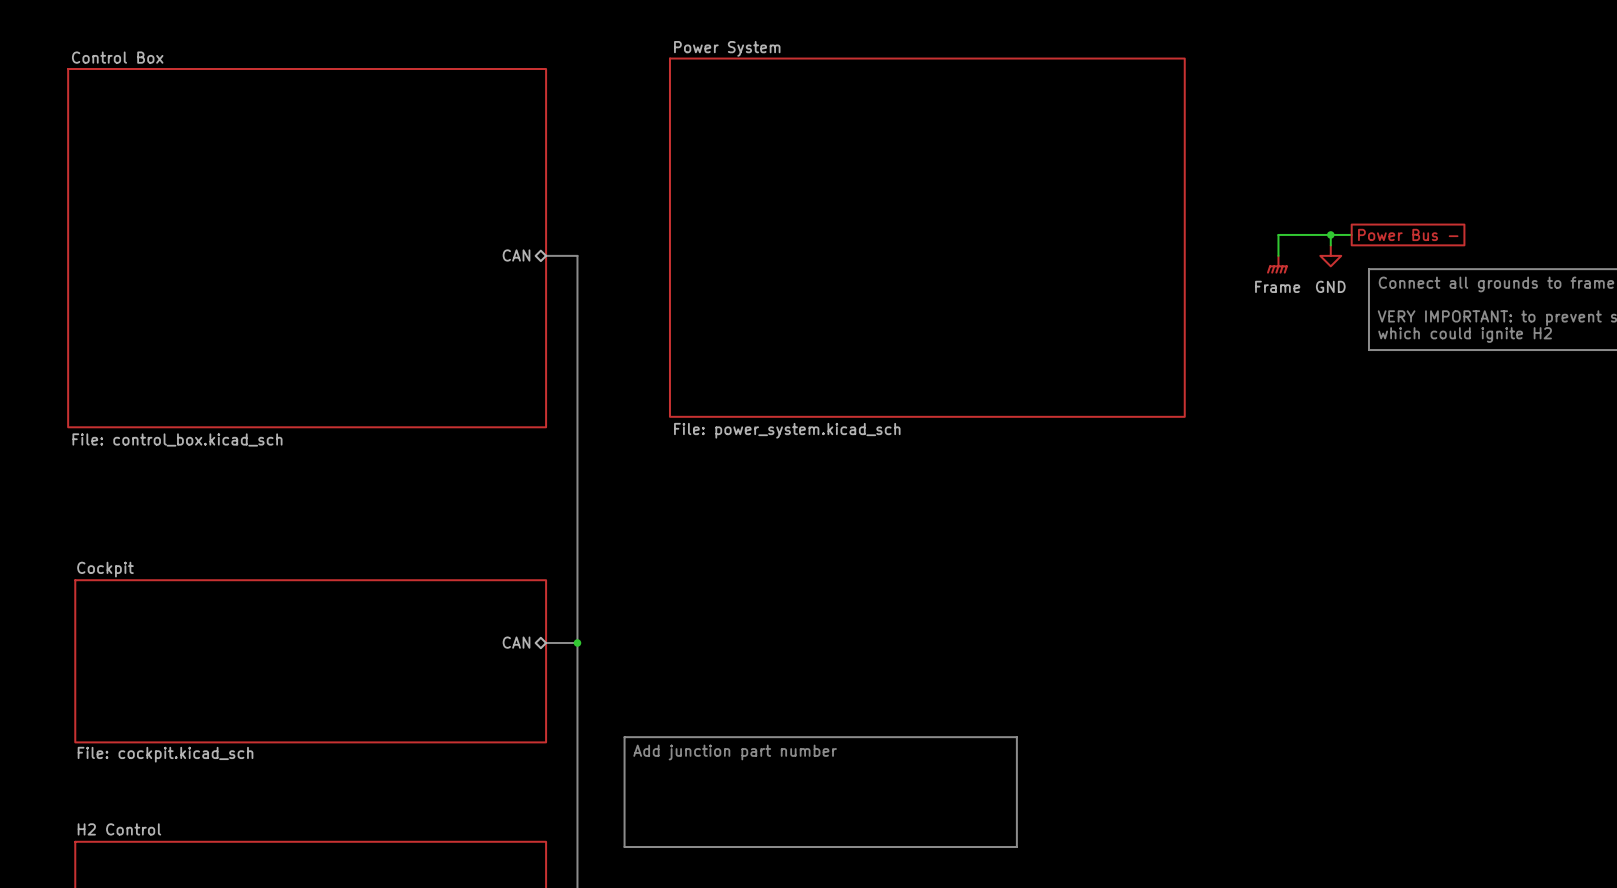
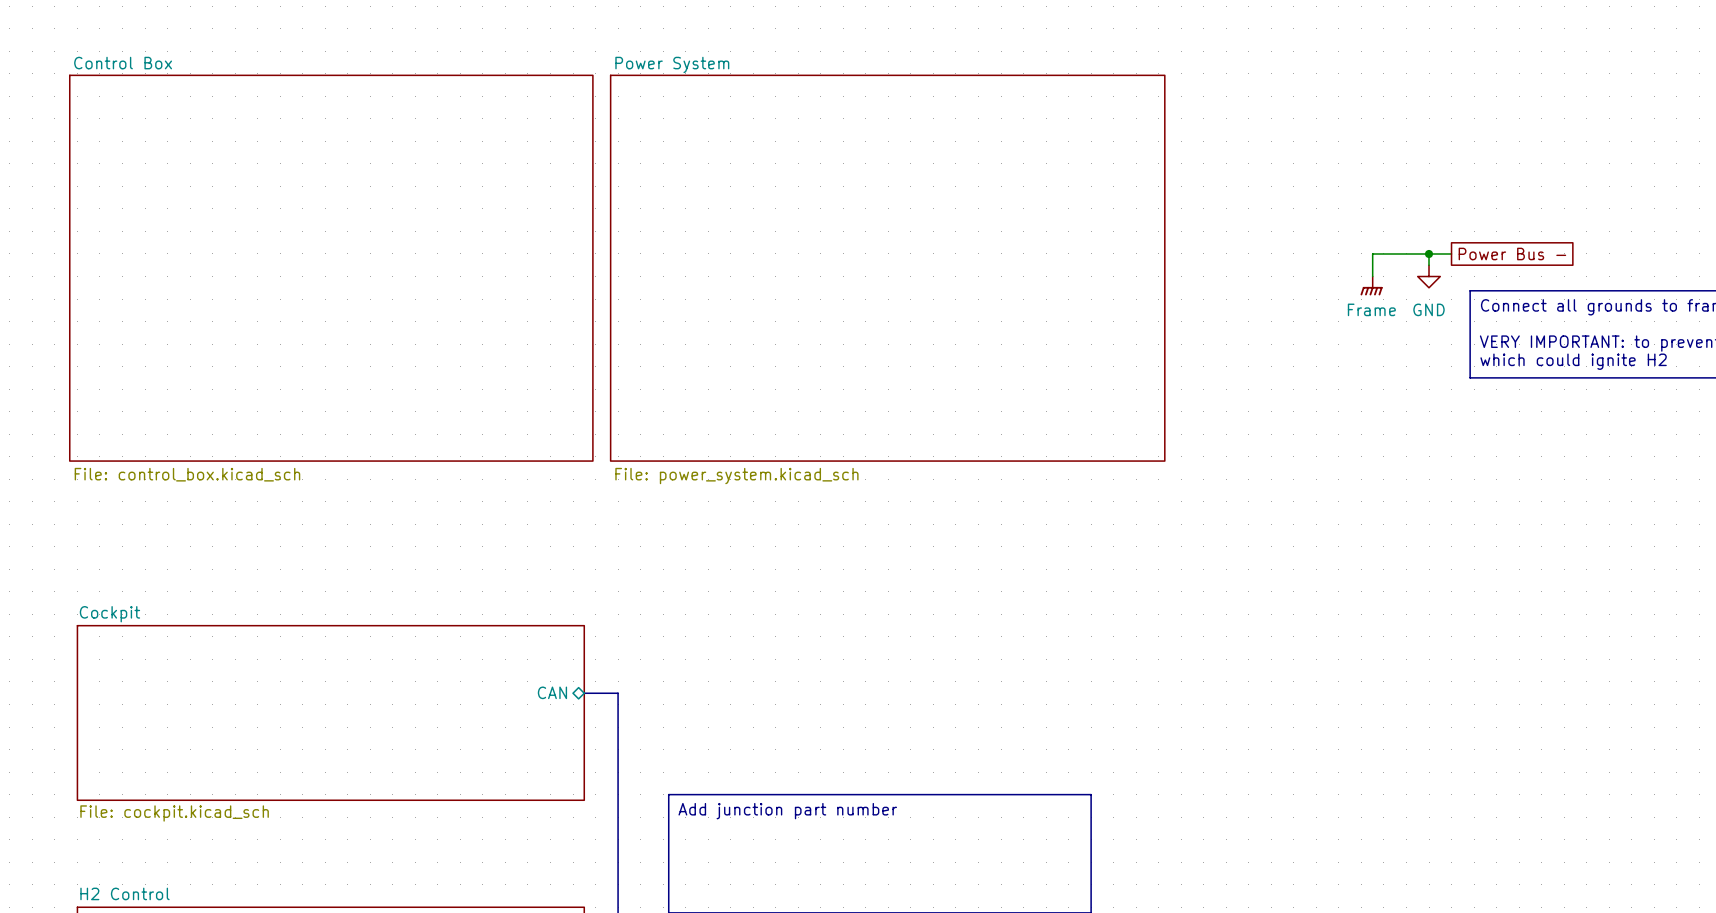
sheet Control Box shape: [67, 68, 547, 428] -> [69, 74, 594, 462]
sheet Power System position: (927, 237) -> (887, 268)
sheet pin: CAN (516, 255) -> none
bus: (546, 255) (577, 255) (577, 642) -> none
junction: (577, 642) -> none

